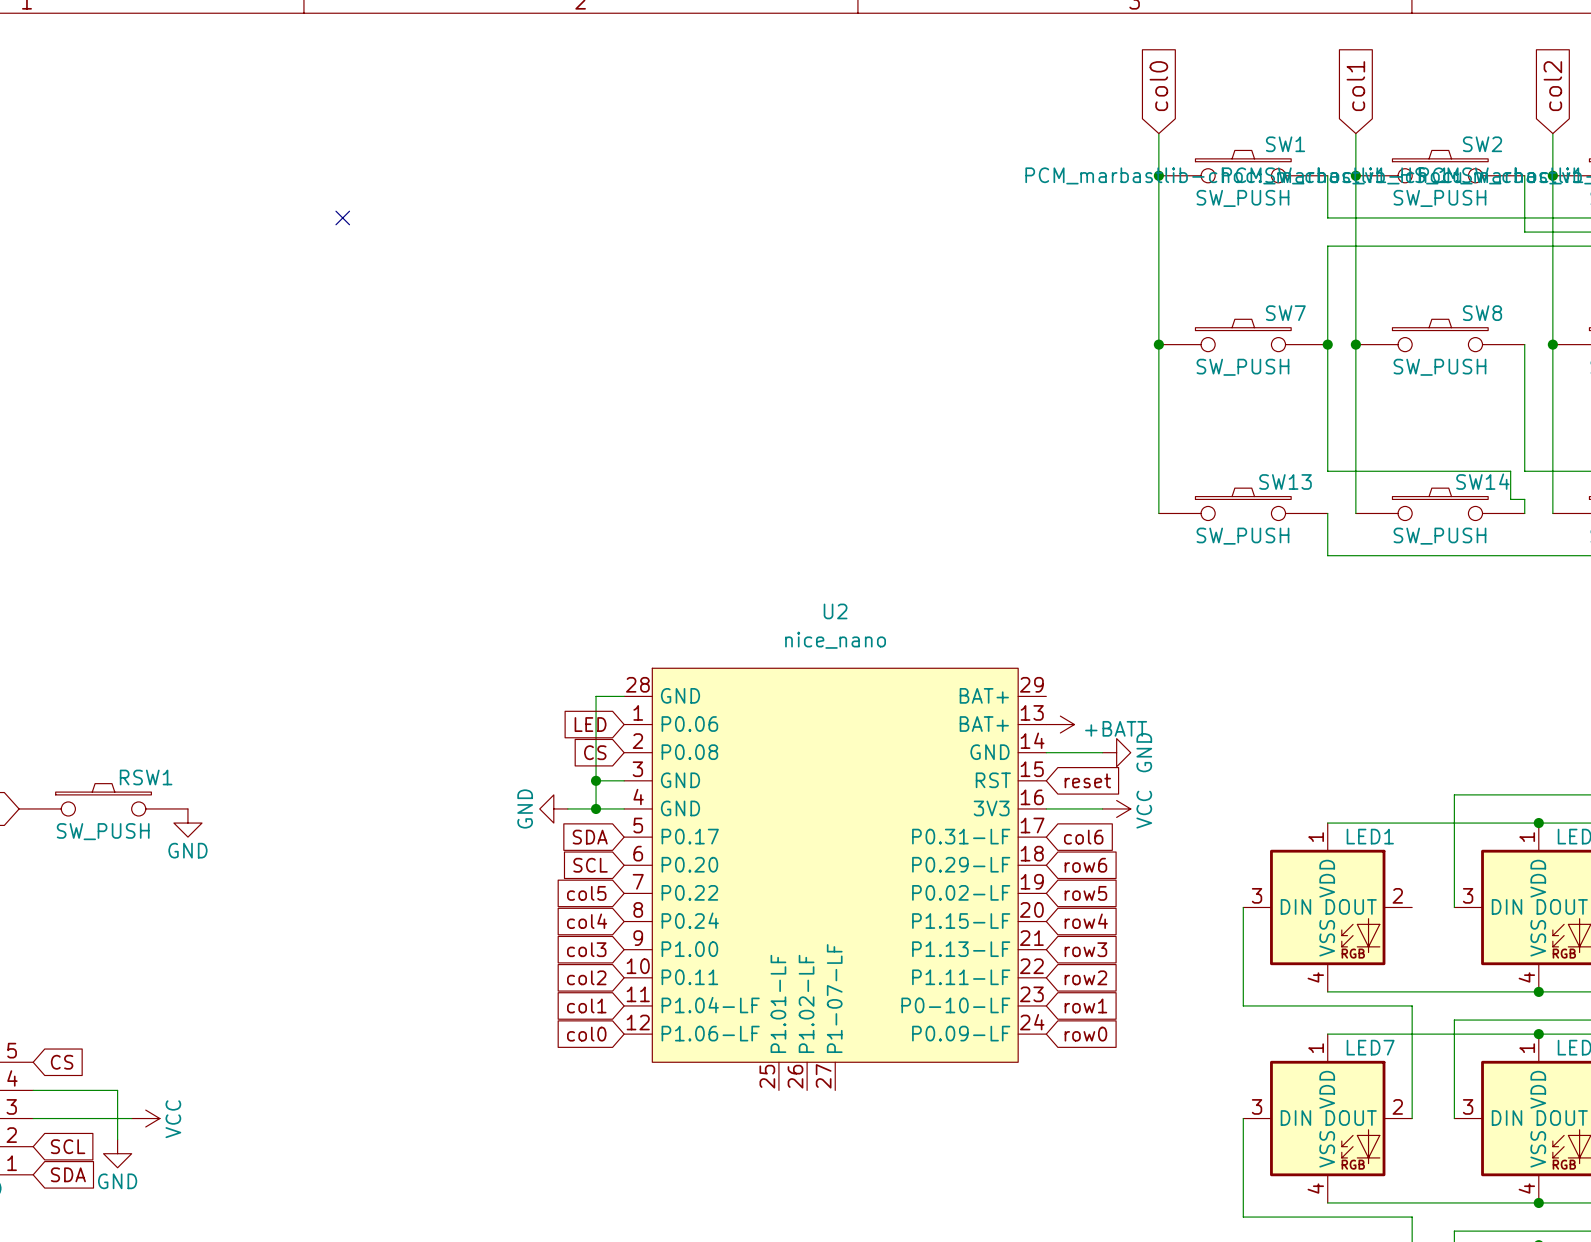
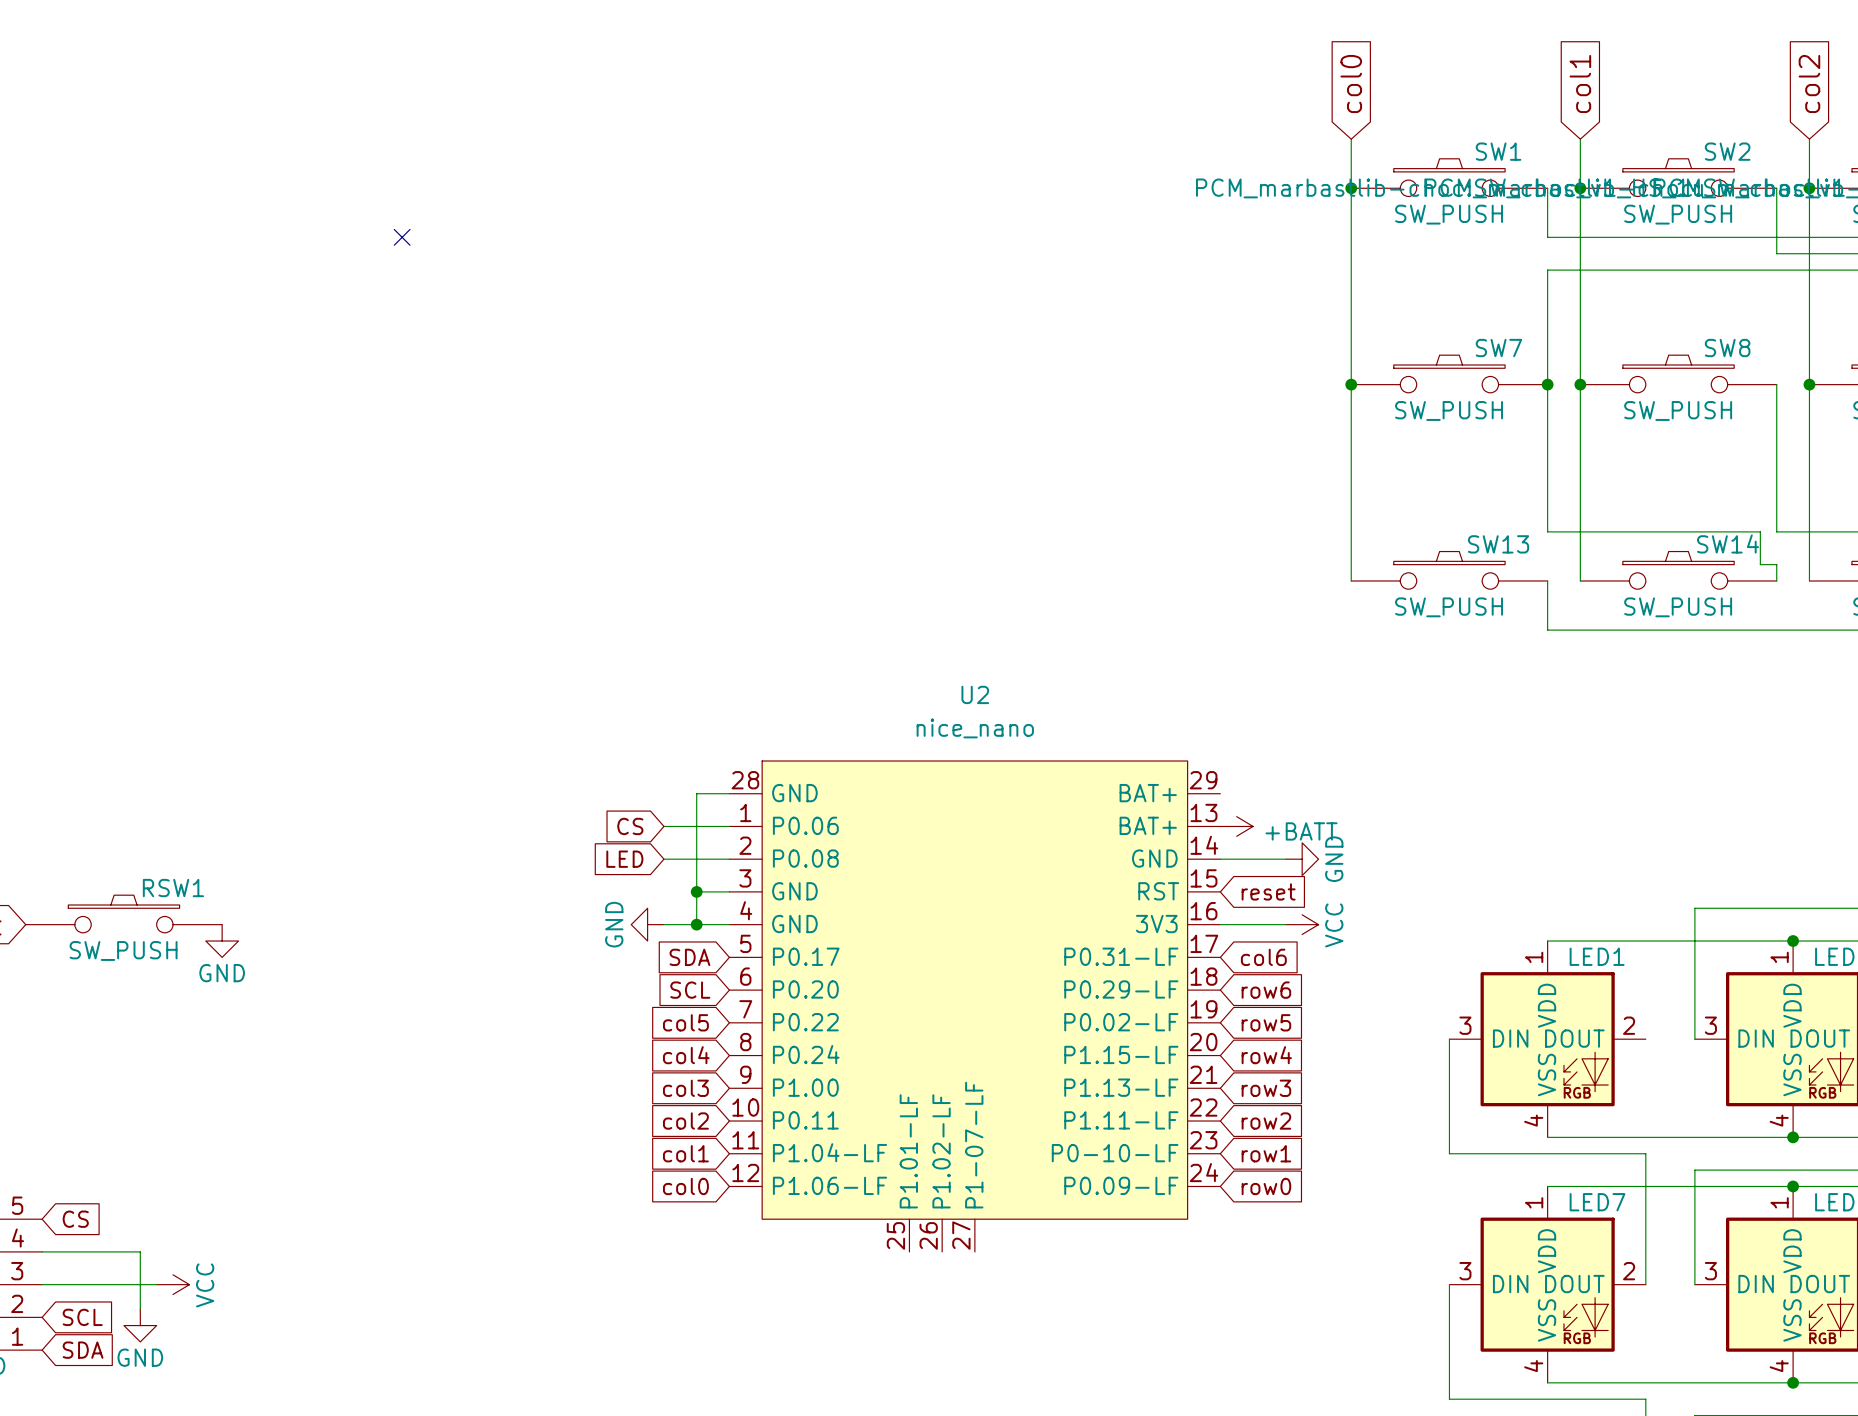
wire: none -> (663, 826) (729, 826)
global label position: LED (590, 724) -> LED (624, 859)
wire: none -> (663, 859) (729, 859)
global label position: CS (595, 752) -> CS (630, 826)

